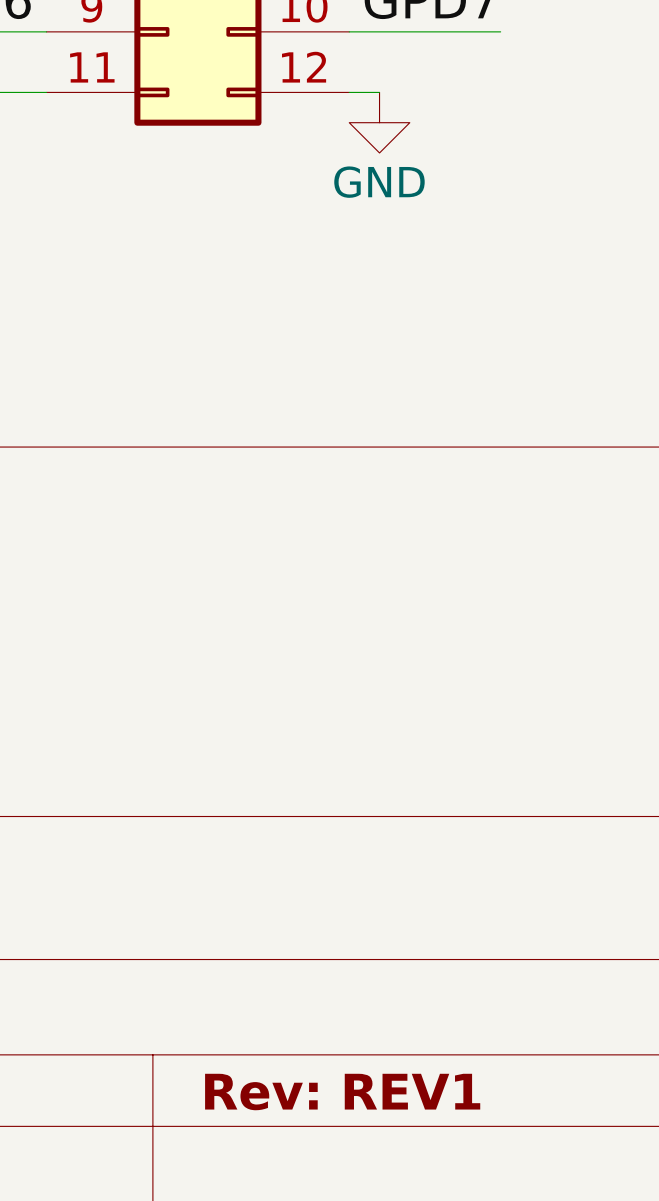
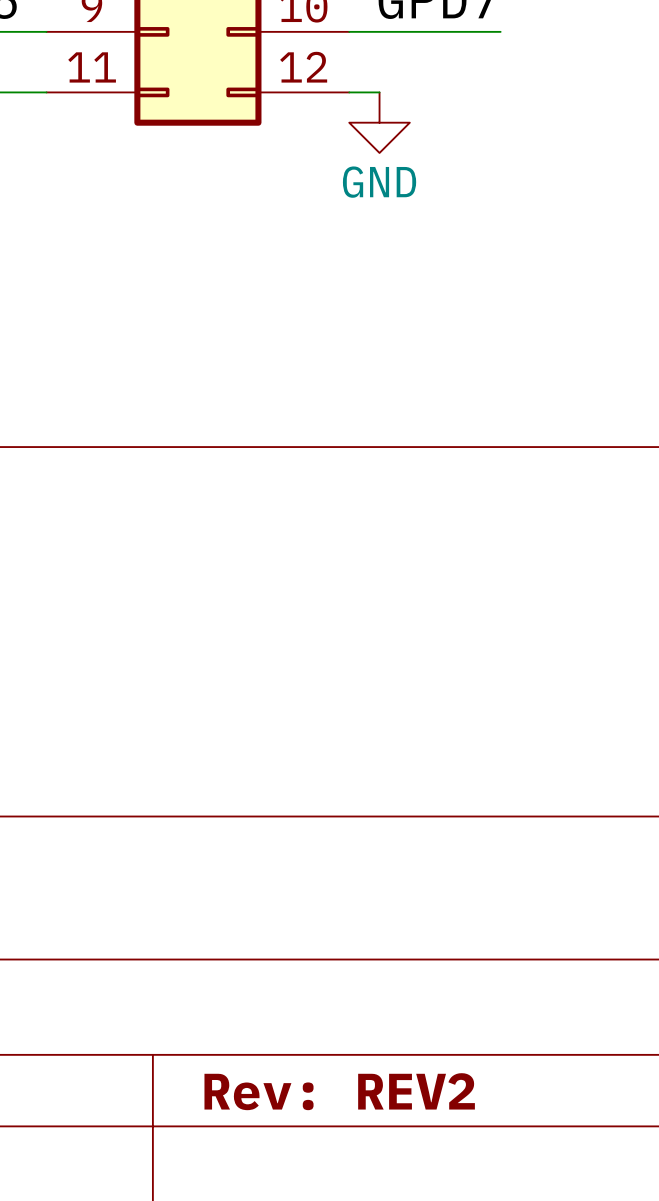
title block: Rev: REV1 (342, 1092) -> Rev: REV2 (339, 1091)

